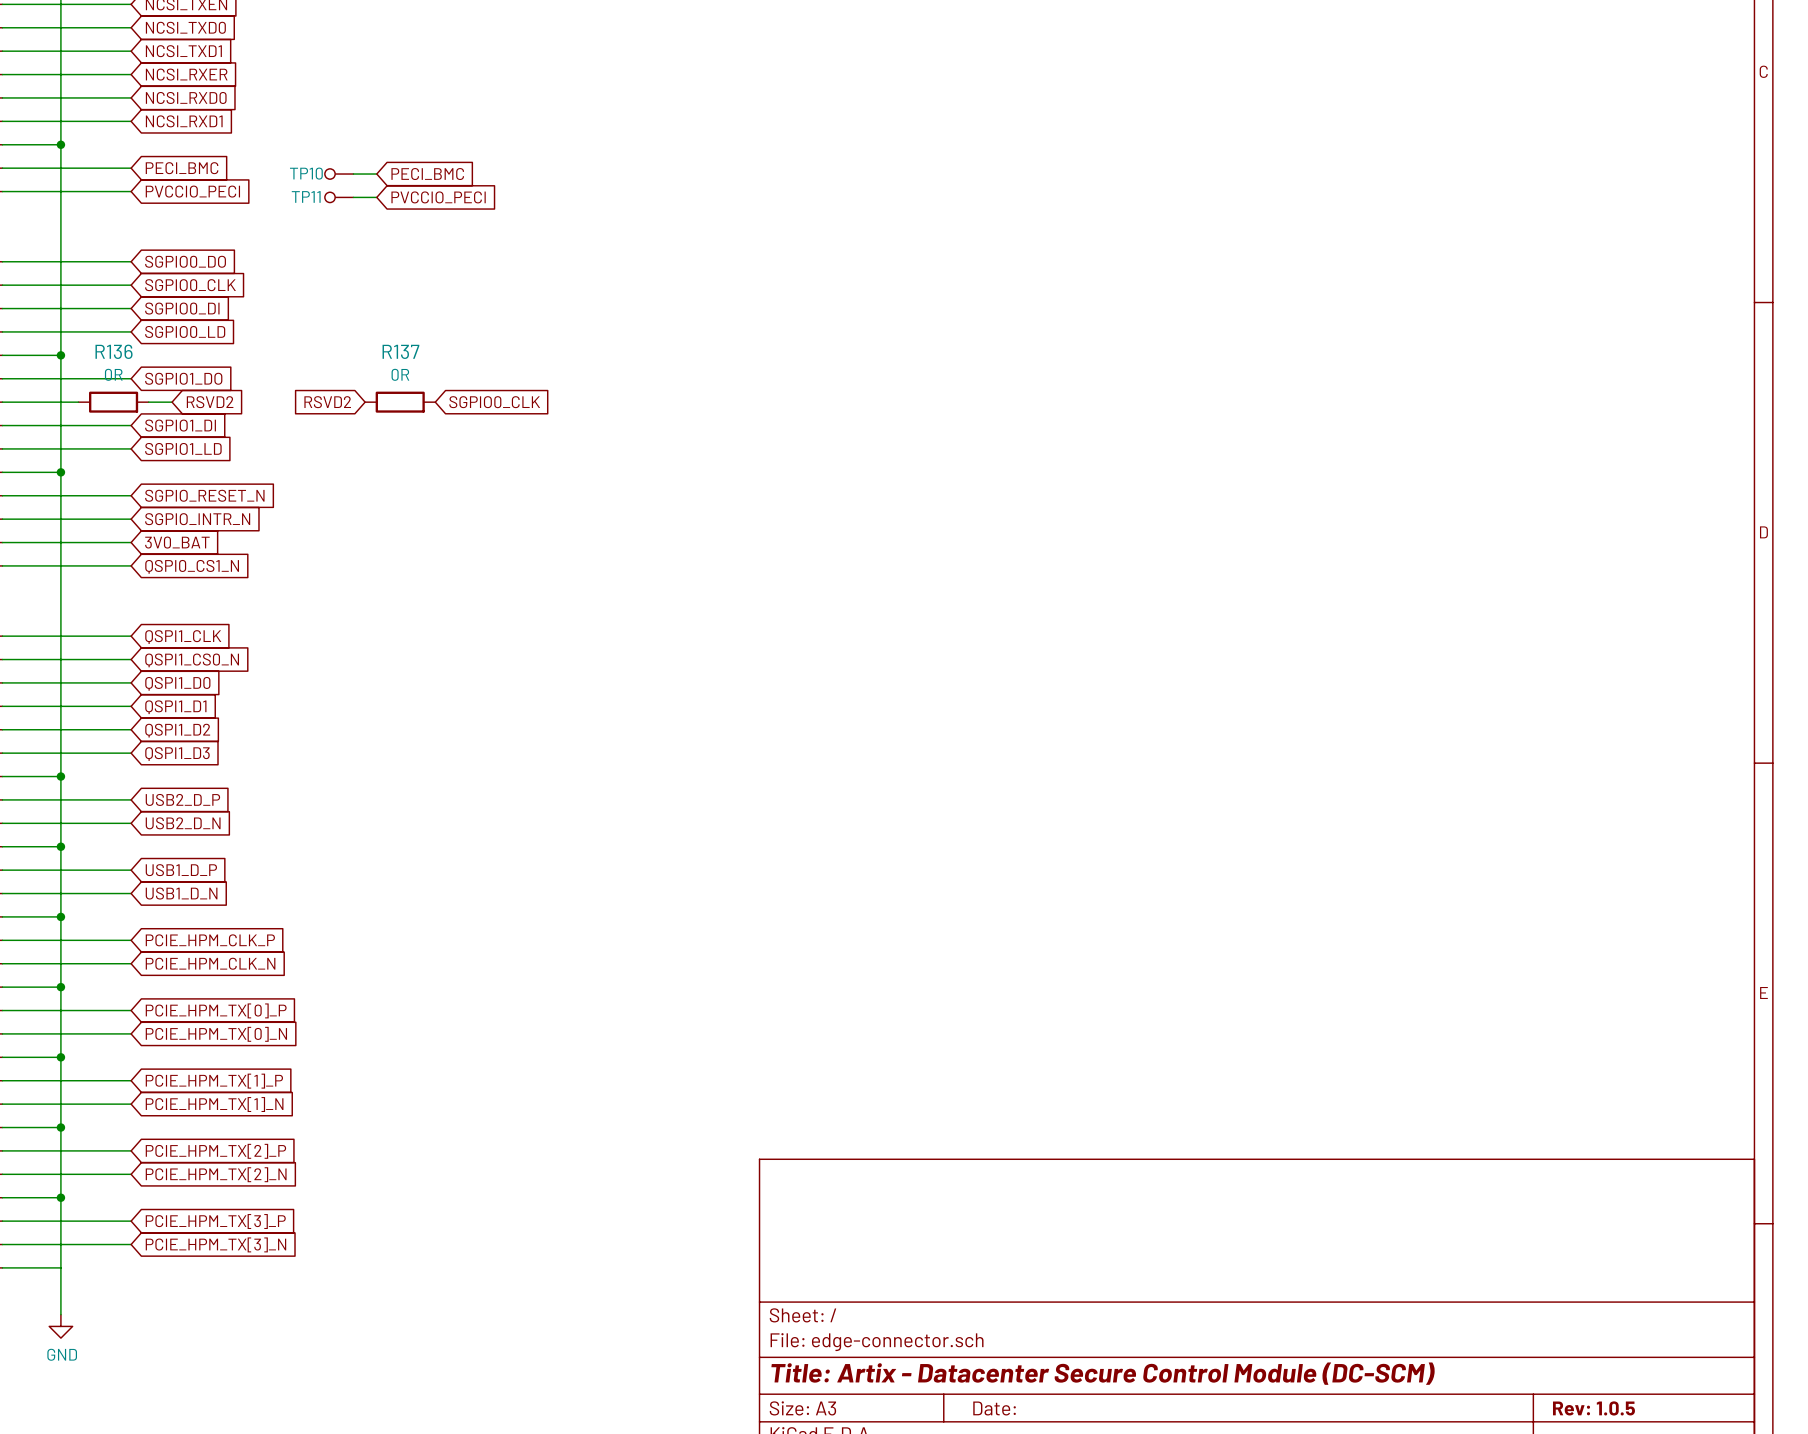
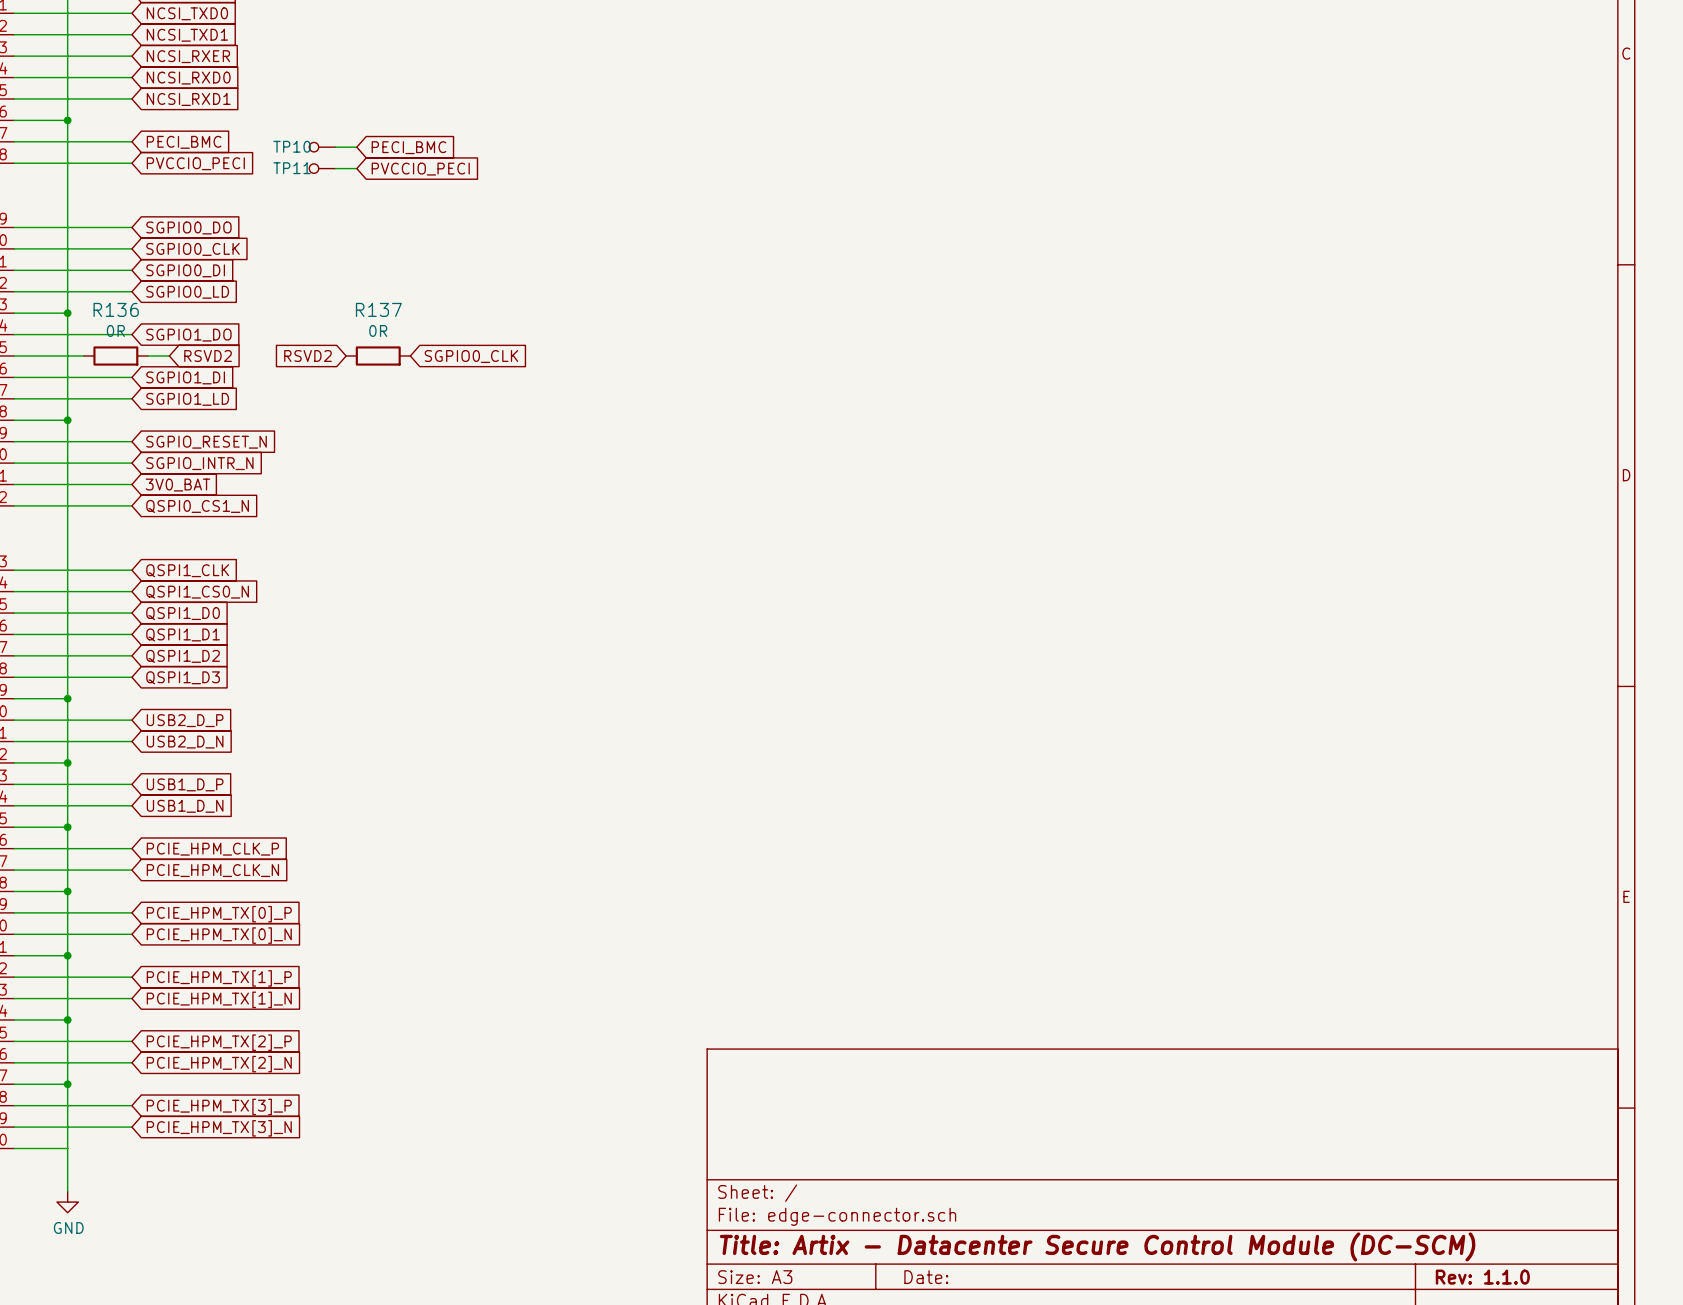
title block: Rev: 1.0.5 (1593, 1408) -> Rev: 1.1.0 (1482, 1277)

